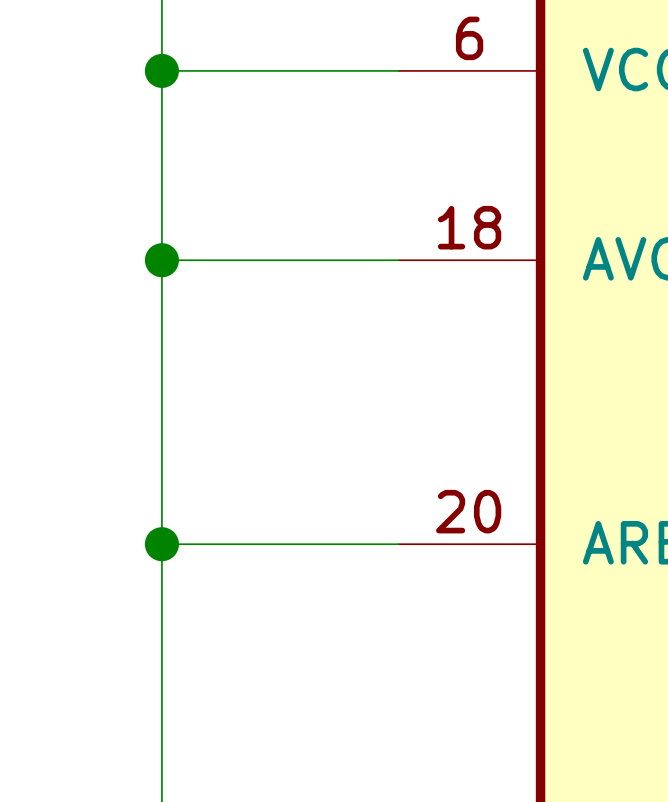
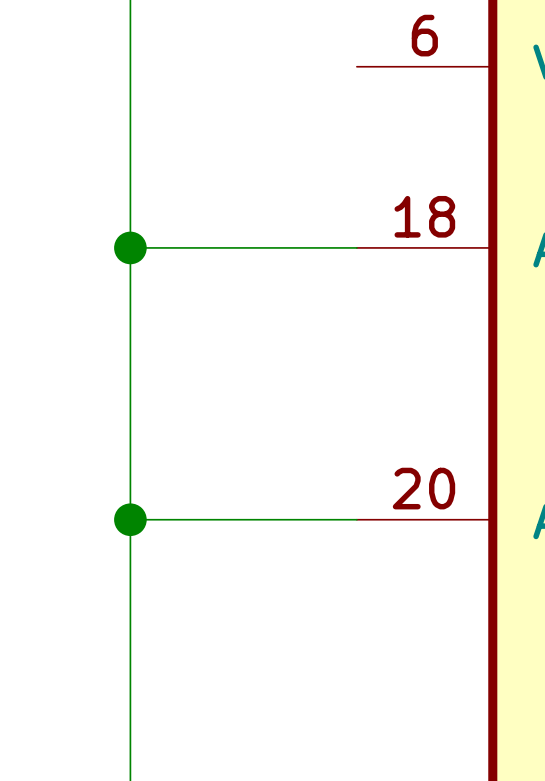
wire: (161, 70) (398, 70) -> none
junction: (161, 70) -> none

